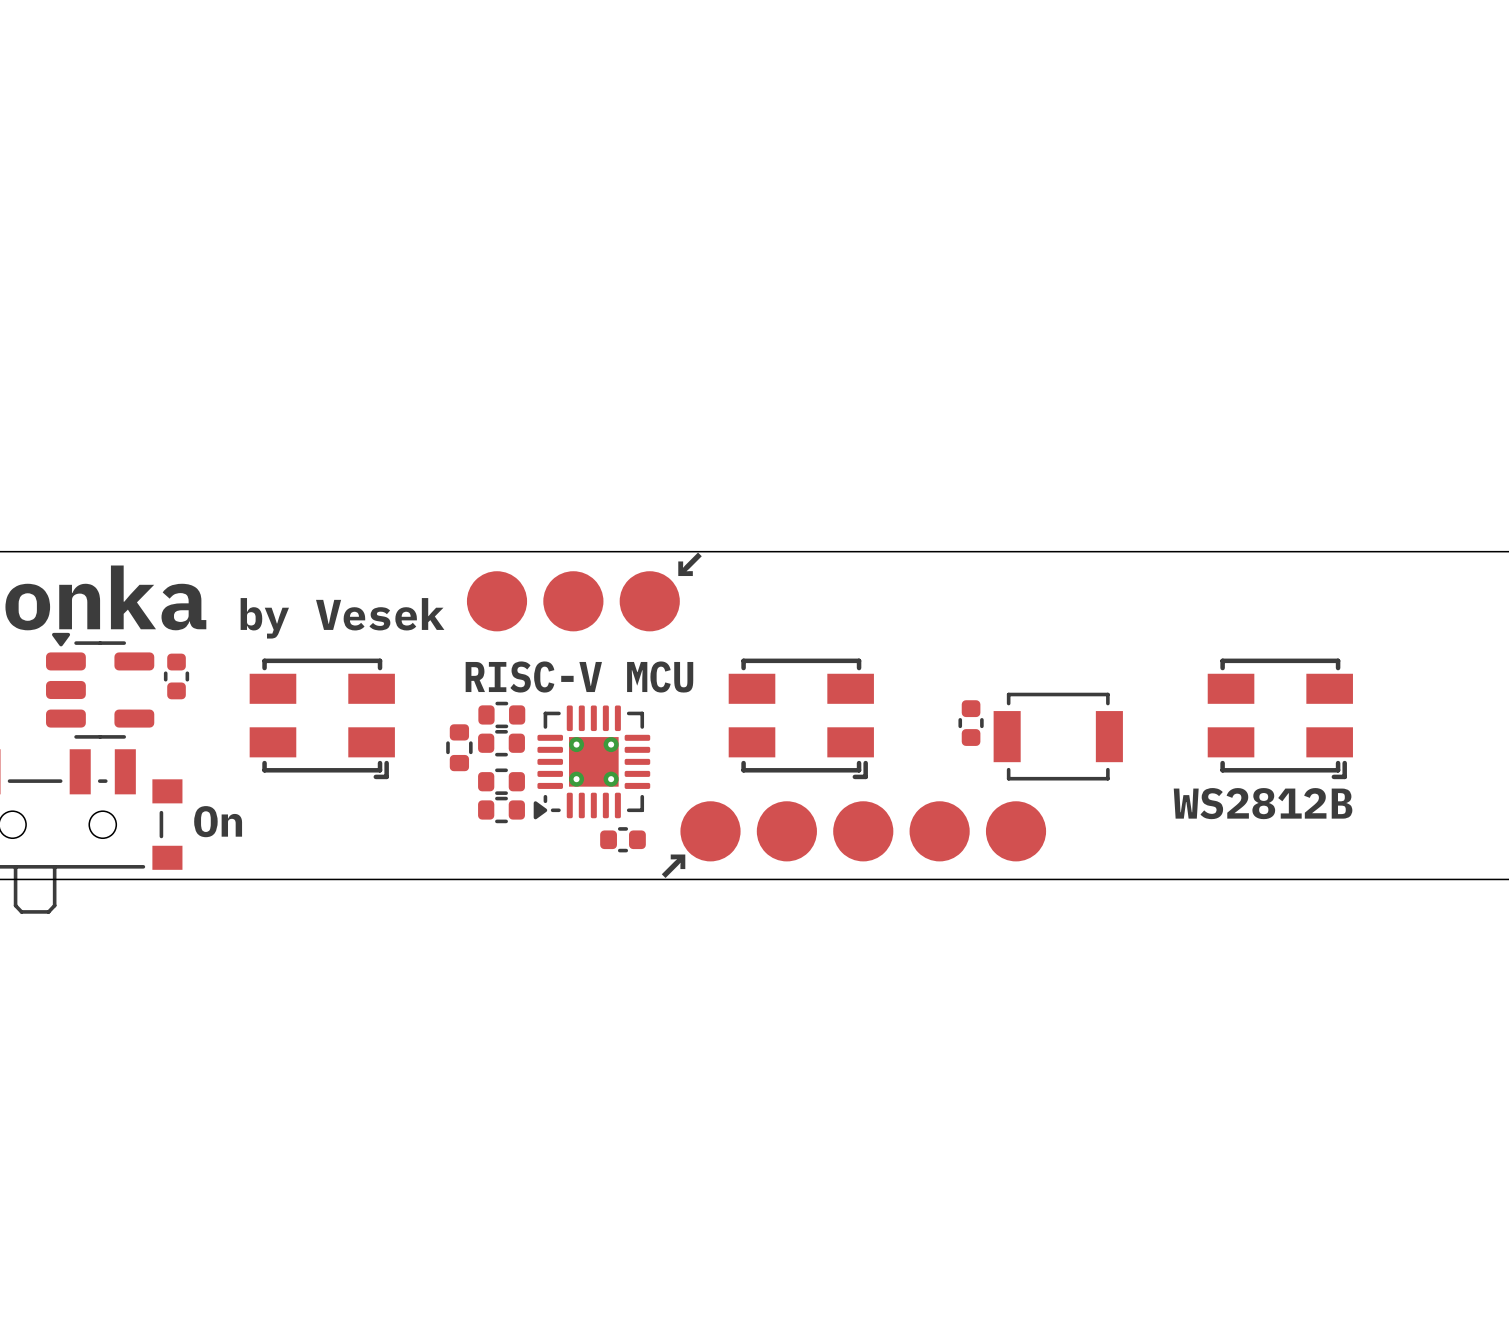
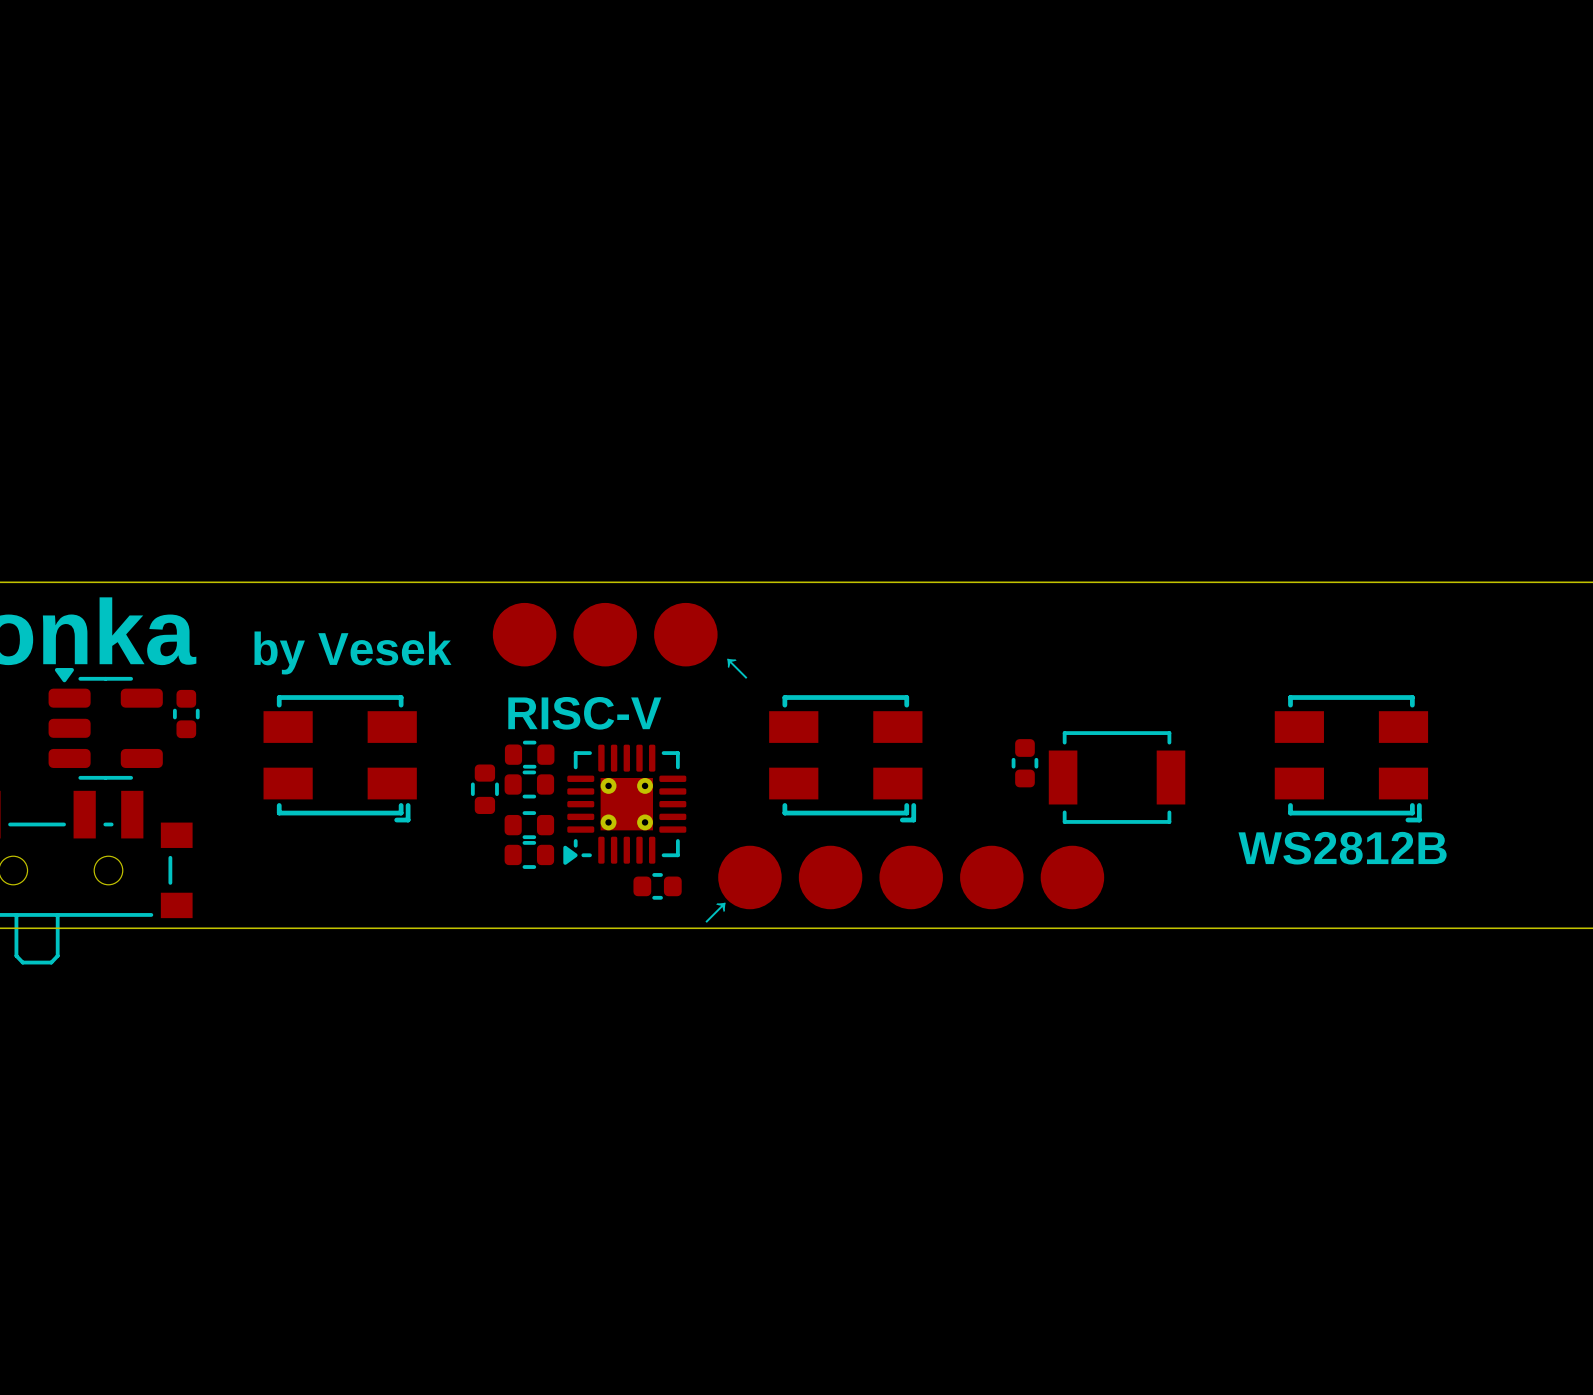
text rotation: 0° (690, 564) -> 90° clockwise (737, 668)
text: RISC-V MCU (579, 677) -> RISC-V (584, 713)
text: On (218, 821) -> none

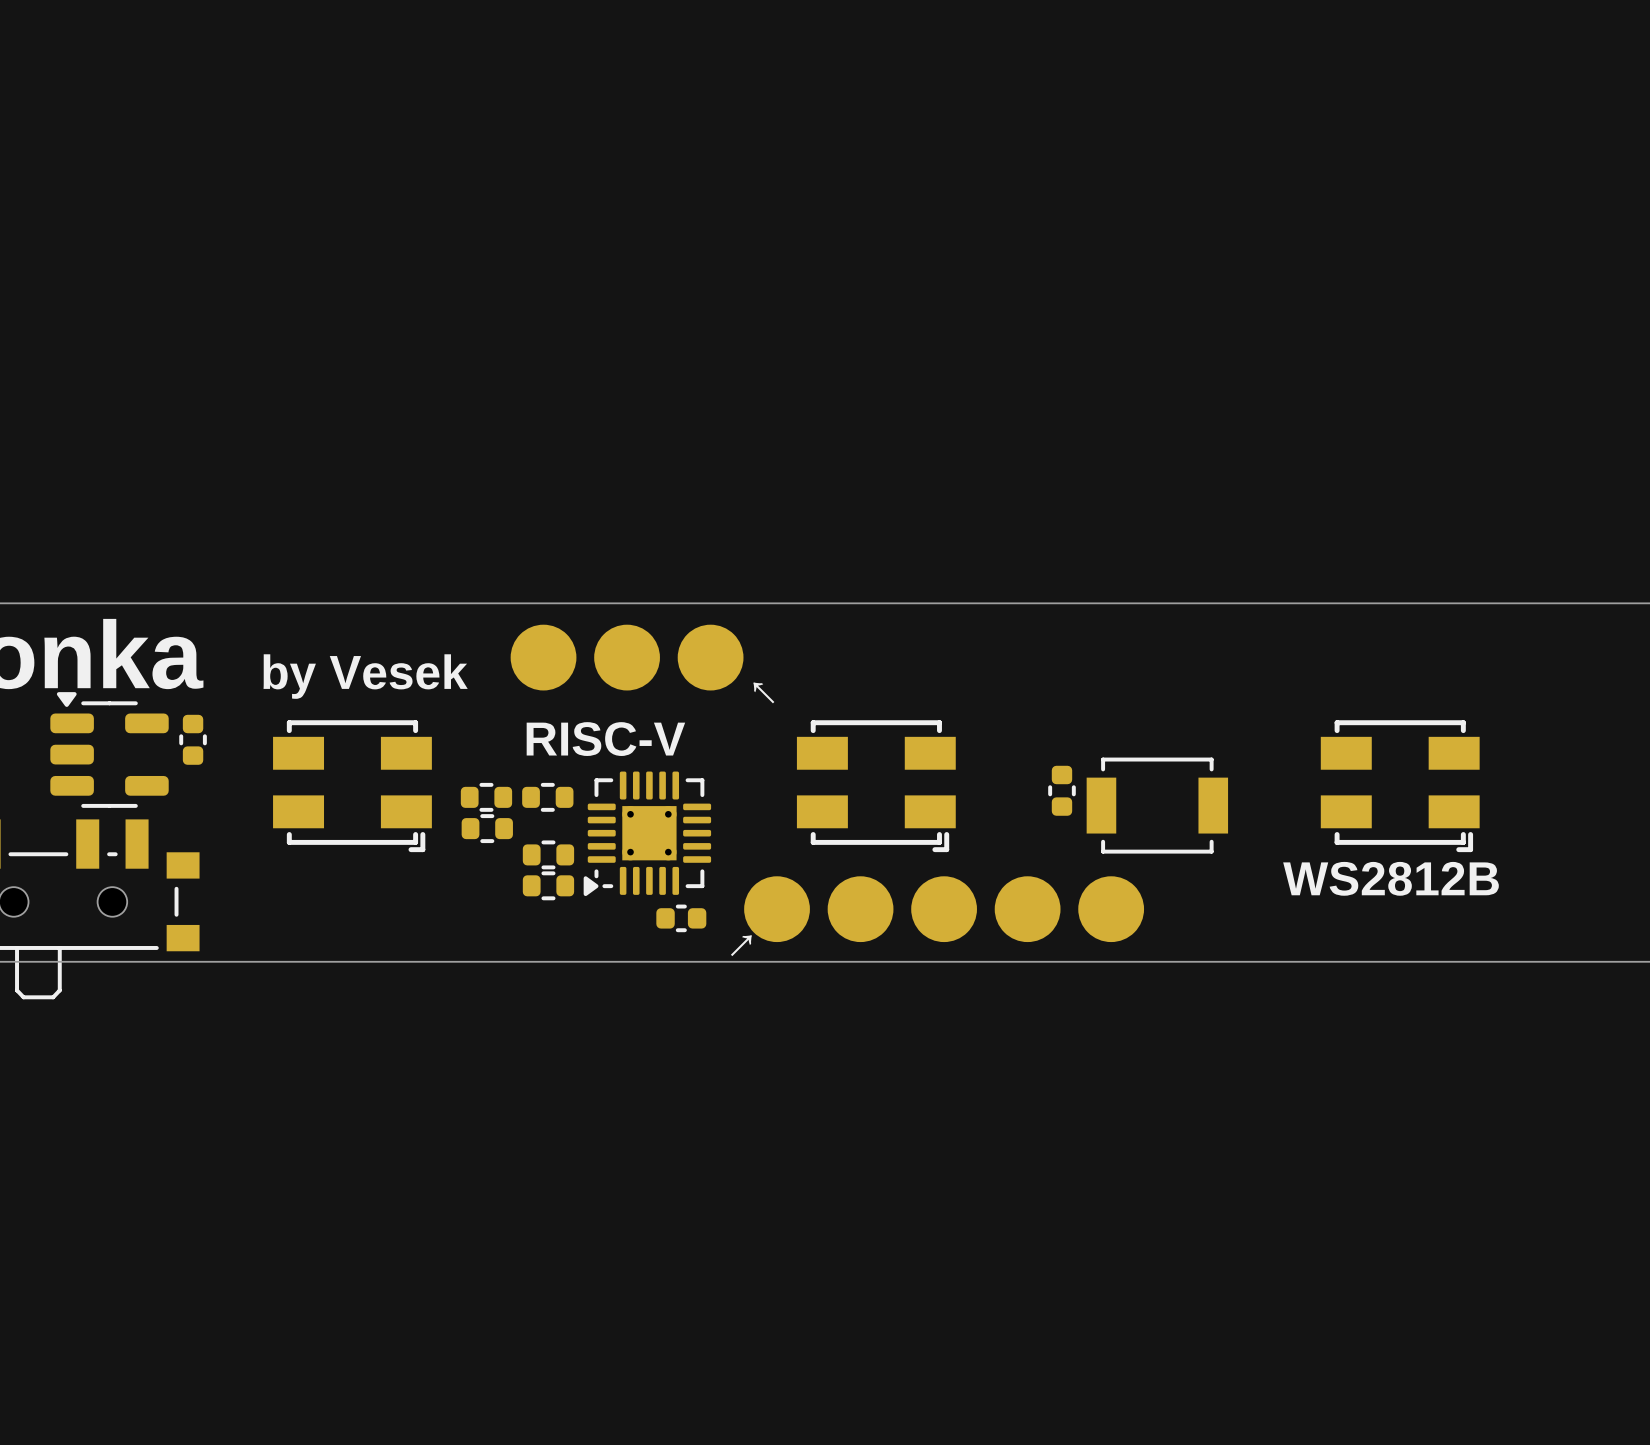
part: (529, 754) -> none
part: none -> (486, 797)
part: none -> (547, 797)
part: (529, 784) -> none
part: (484, 789) -> none
part: none -> (487, 828)

